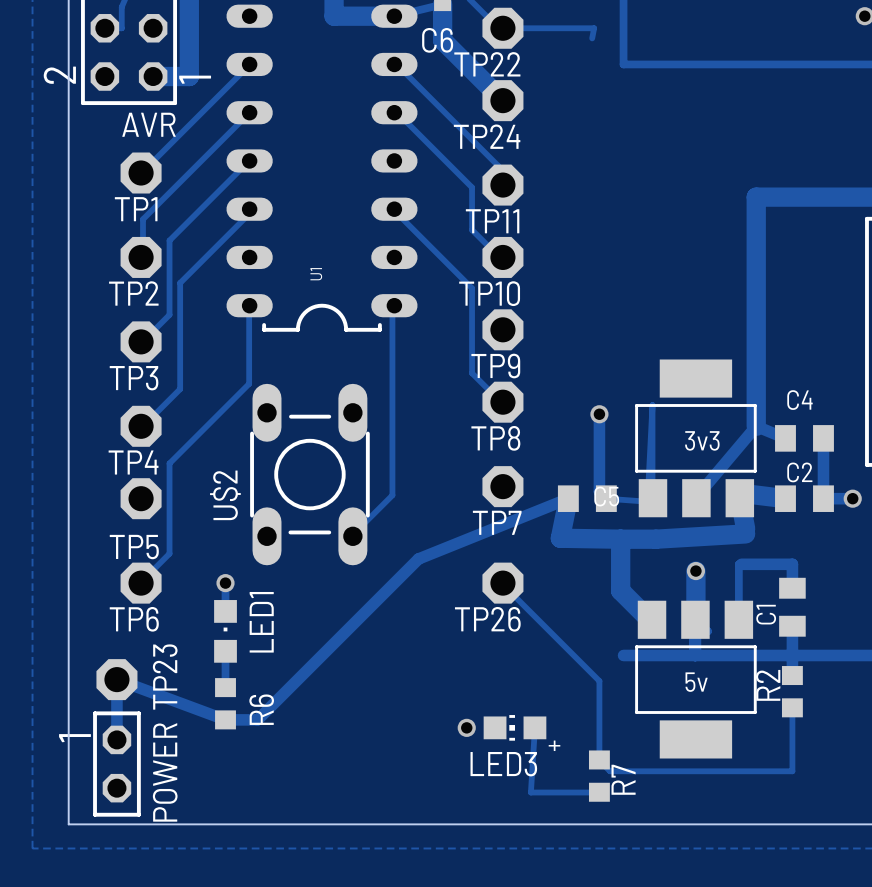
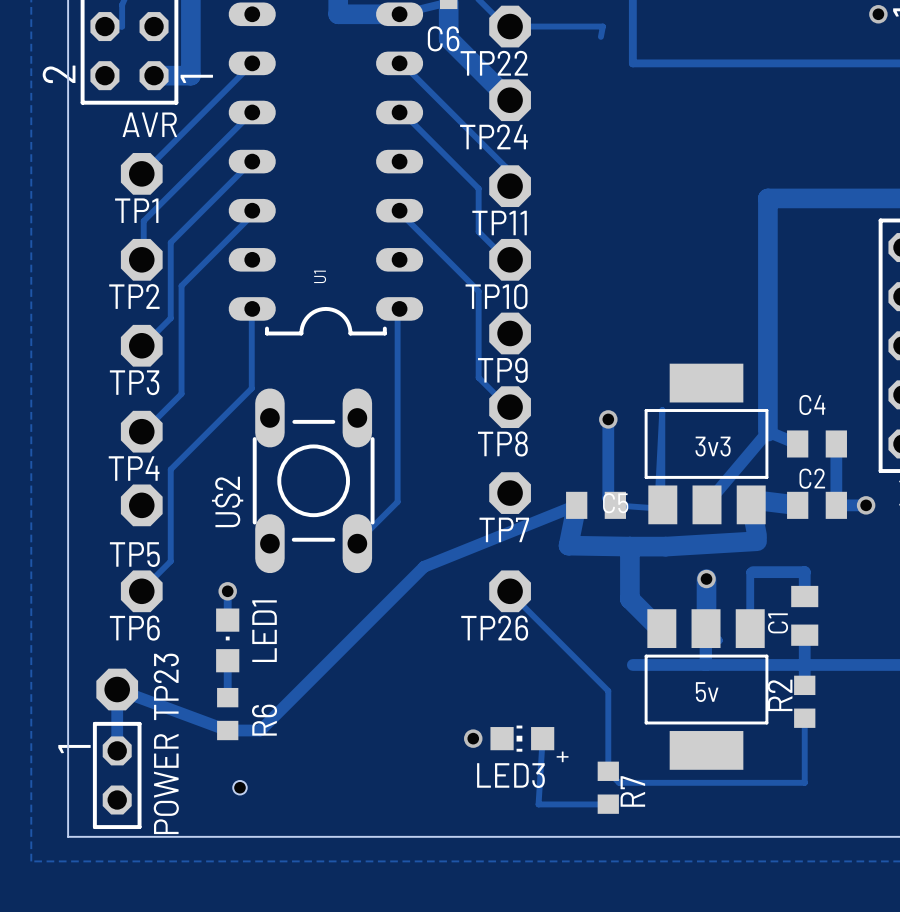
hole: none -> (239, 787)

